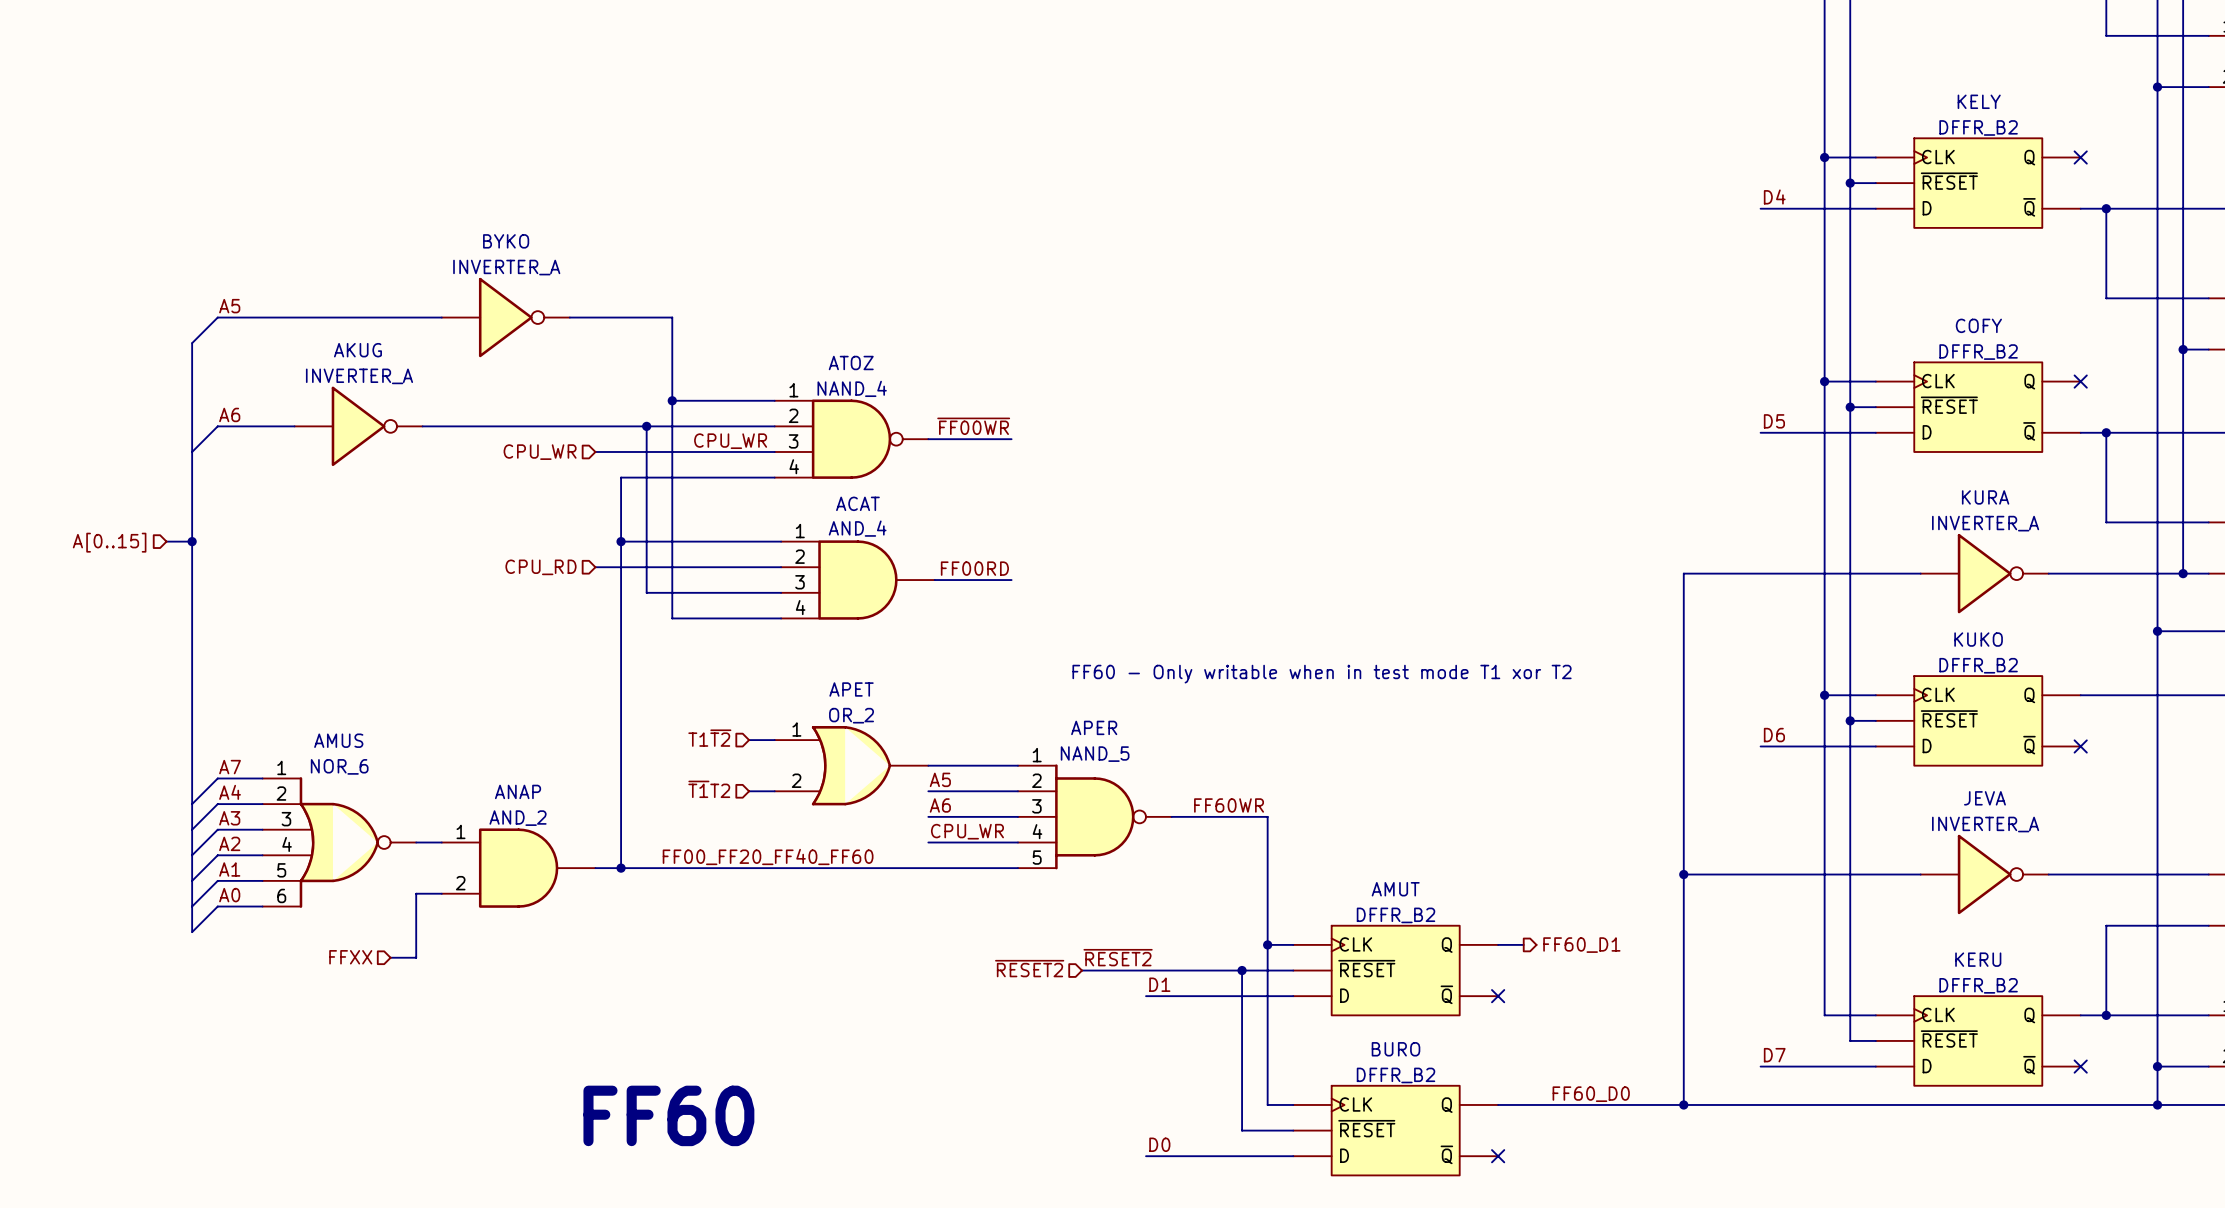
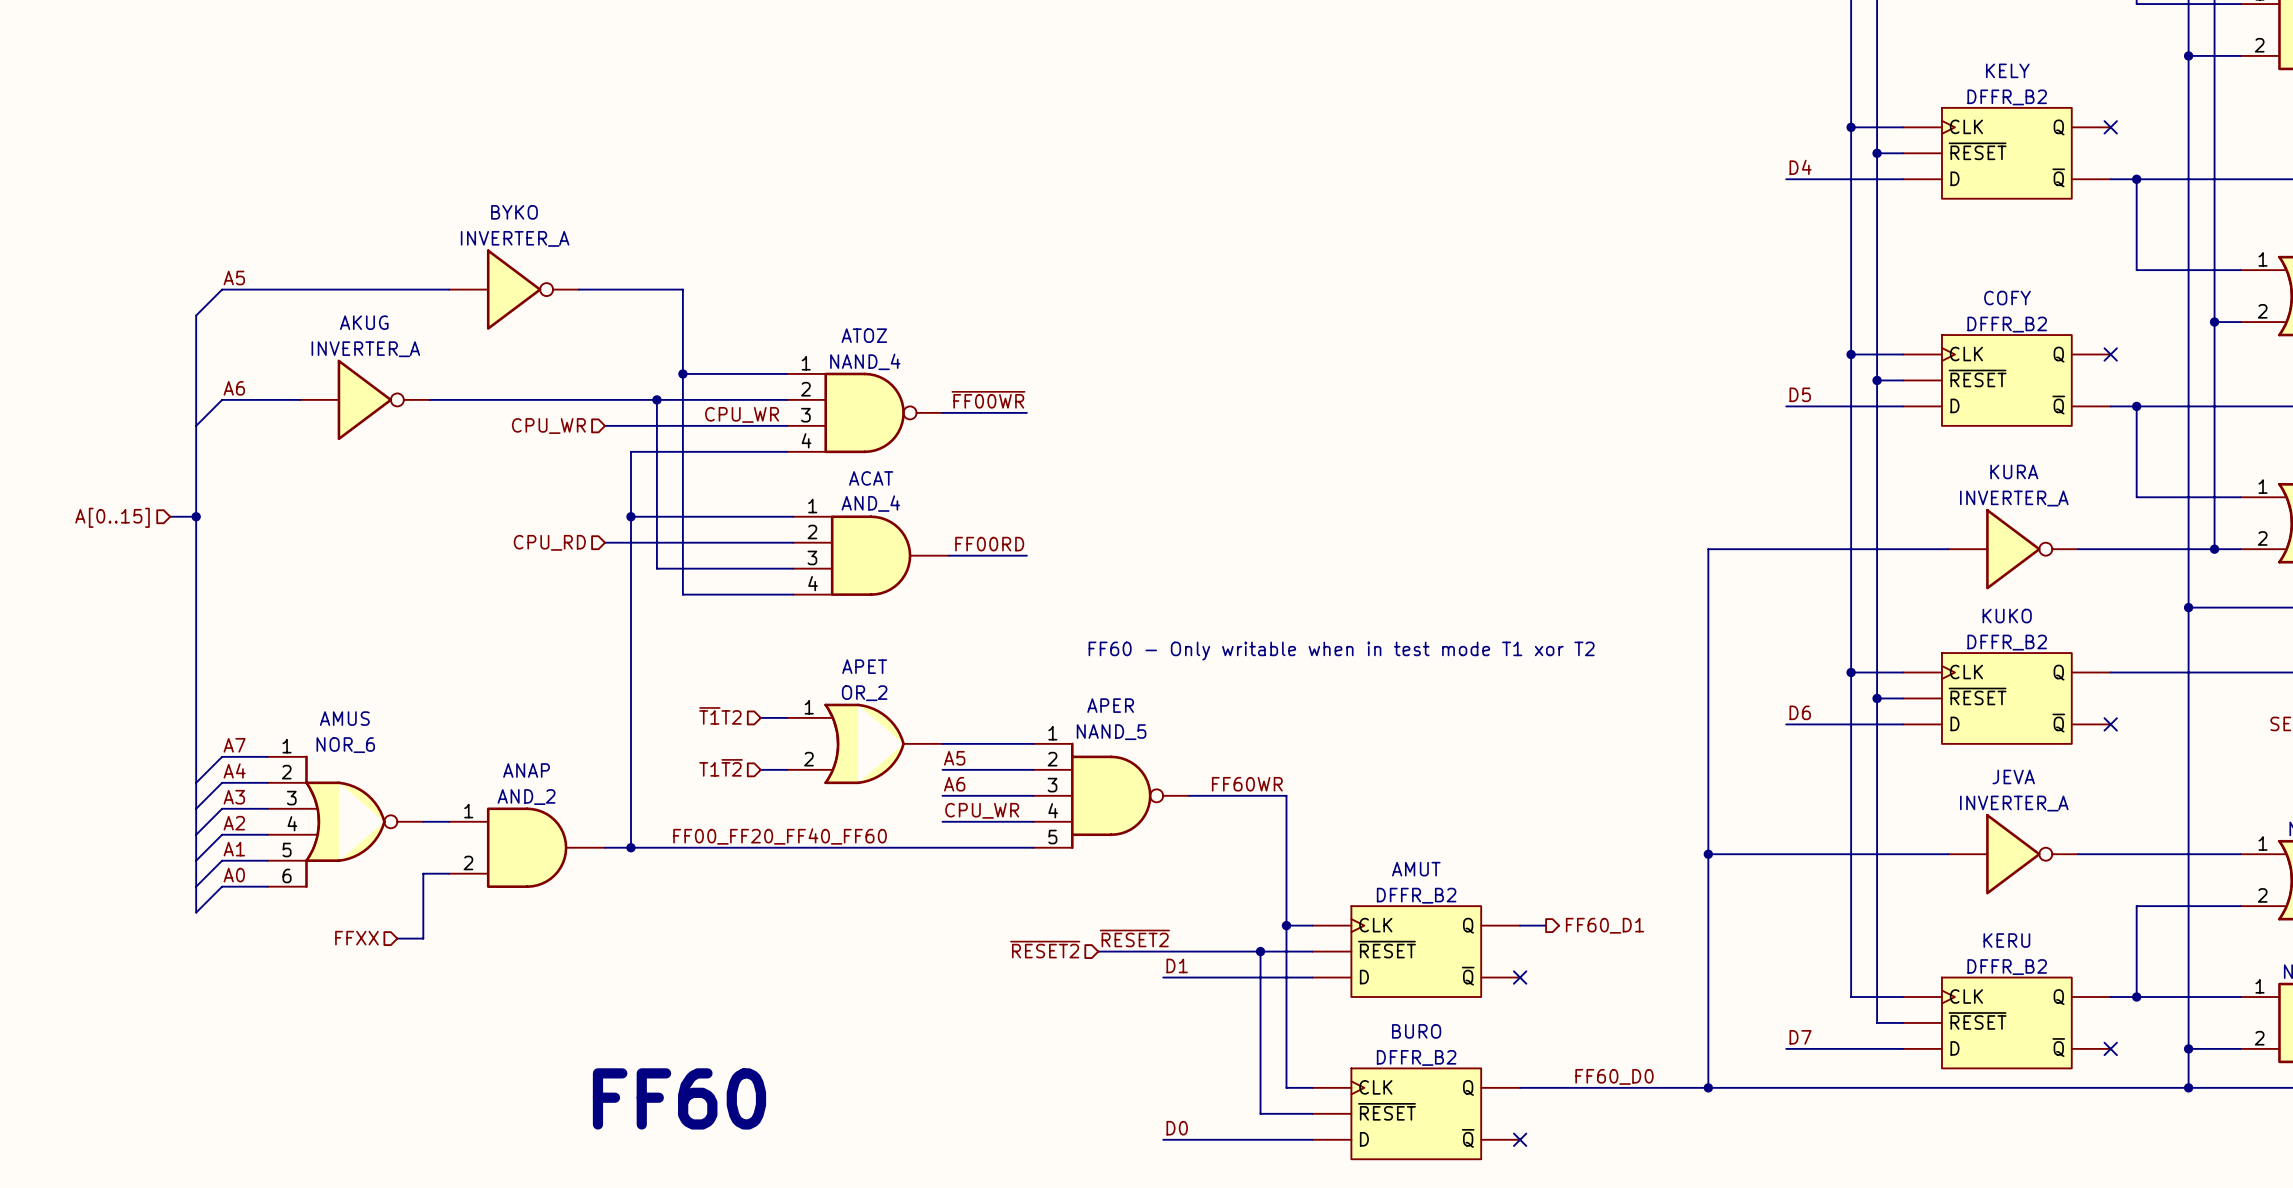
hierarchical label: T1~{T2} (709, 738) -> ~{T1}T2 (720, 715)
hierarchical label: ~{T1}T2 (709, 789) -> T1~{T2} (721, 767)

